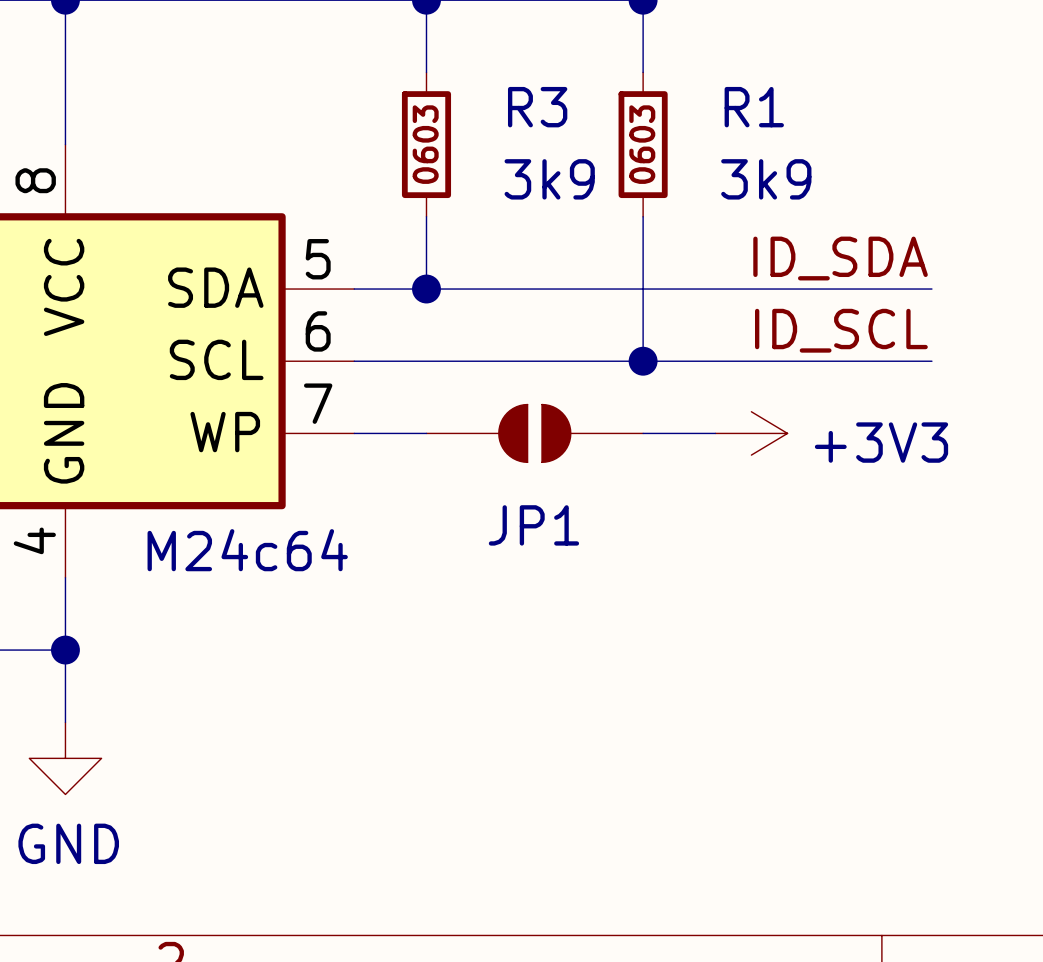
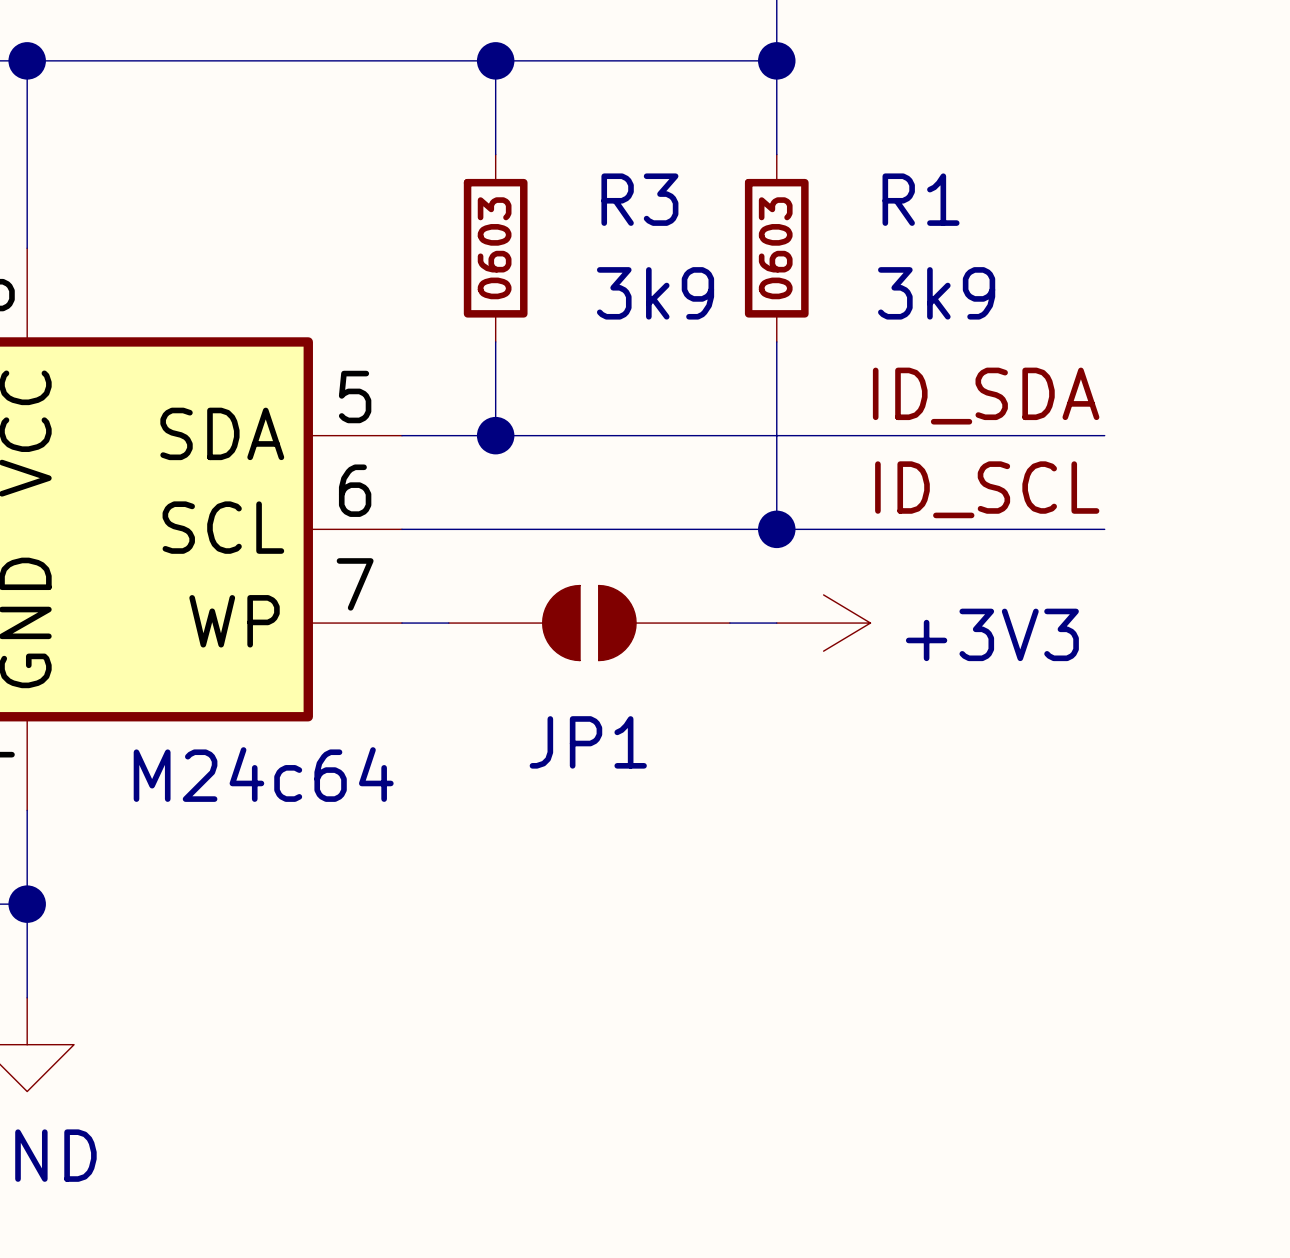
label position: ID_SDA (840, 258) -> ID_SDA (986, 396)
wire: (895, 289) (931, 289) -> none
label position: ID_SCL (841, 330) -> ID_SCL (987, 489)
wire: (895, 361) (931, 361) -> none
JP1 position: (534, 433) -> (589, 623)
power symbol position: +3V3 (751, 433) -> +3V3 (823, 623)

